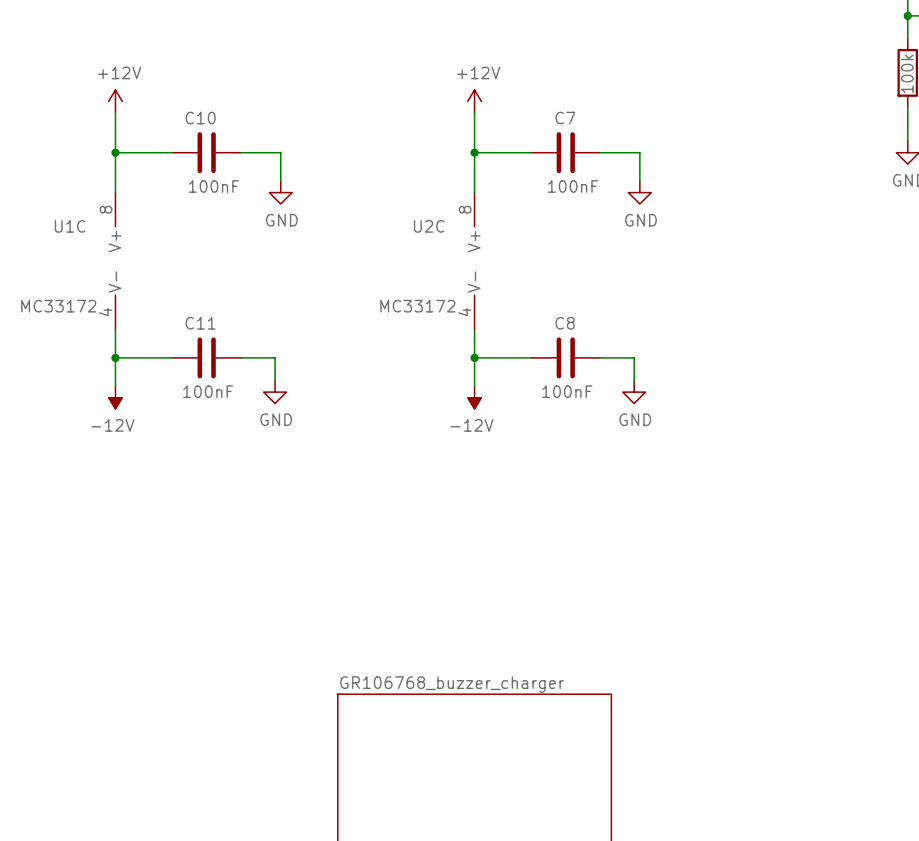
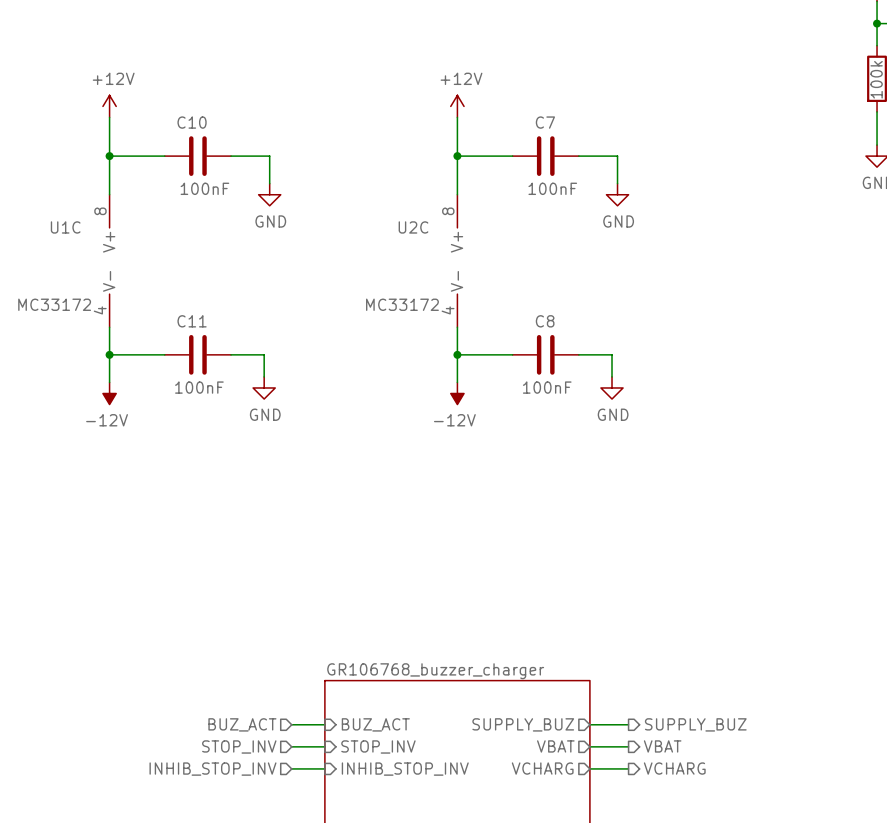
hierarchical label: none -> BUZ_ACT (242, 724)
wire: none -> (291, 724) (324, 724)
sheet pin: none -> BUZ_ACT (375, 724)
sheet pin: none -> SUPPLY_BUZ (523, 724)
wire: none -> (589, 724) (628, 724)
hierarchical label: none -> SUPPLY_BUZ (695, 724)
hierarchical label: none -> STOP_INV (239, 746)
wire: none -> (291, 746) (324, 746)
sheet pin: none -> STOP_INV (378, 746)
sheet pin: none -> VBAT (555, 746)
wire: none -> (589, 746) (628, 746)
hierarchical label: none -> VBAT (662, 746)
sheet pin: none -> VCHARG (542, 768)
hierarchical label: none -> VCHARG (674, 768)
hierarchical label: none -> INHIB_STOP_INV (212, 769)
wire: none -> (291, 768) (324, 768)
sheet pin: none -> INHIB_STOP_INV (405, 769)
wire: none -> (589, 768) (628, 768)

